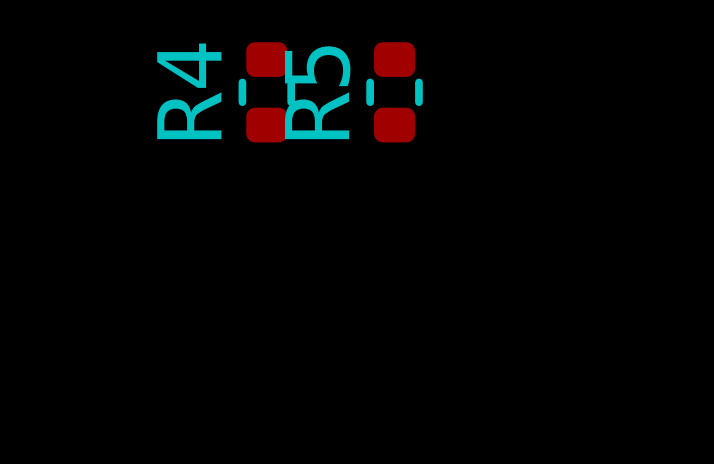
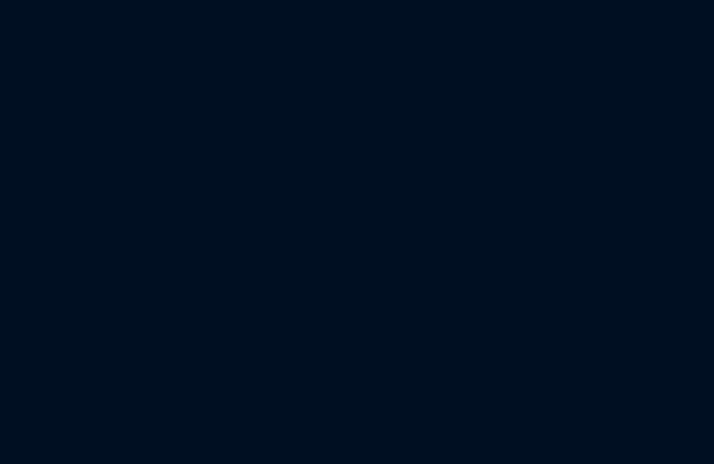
R4: (266, 92) -> none
R5: (394, 92) -> none

